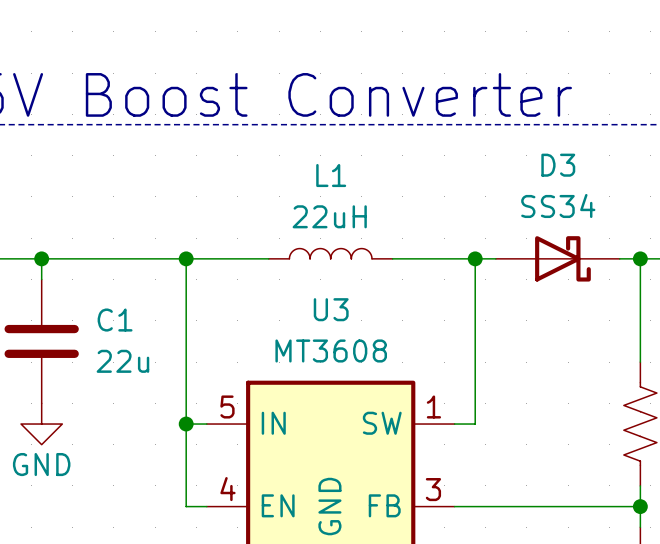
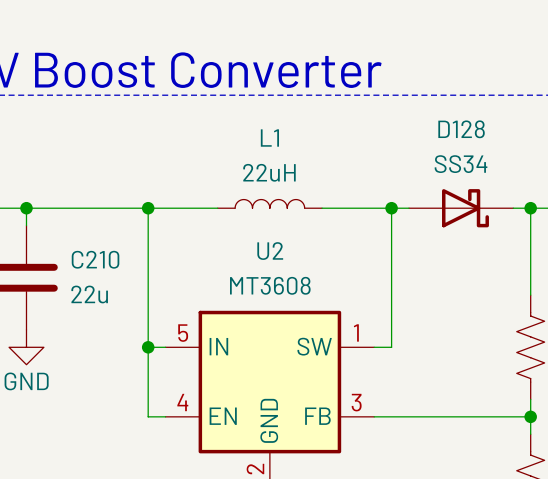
D3 name: D3 (558, 165) -> D128 (461, 129)
U3 name: U3 (331, 309) -> U2 (270, 251)
C1 name: C1 (115, 320) -> C210 (95, 259)

